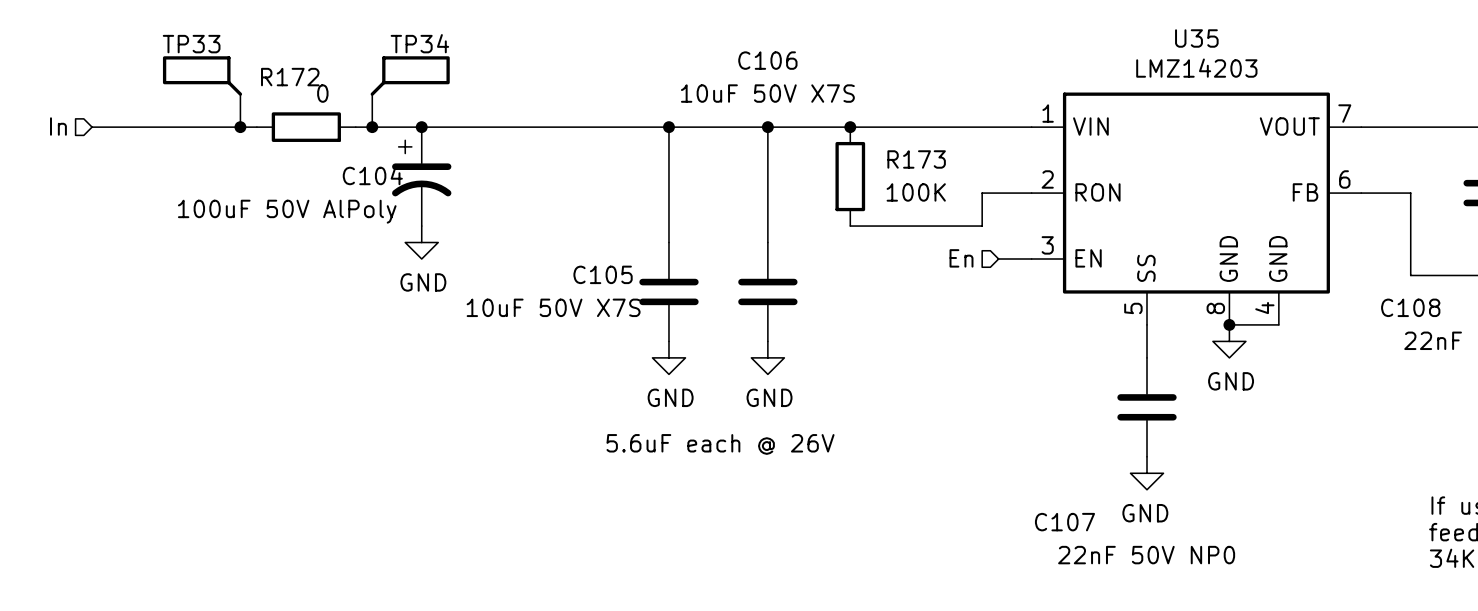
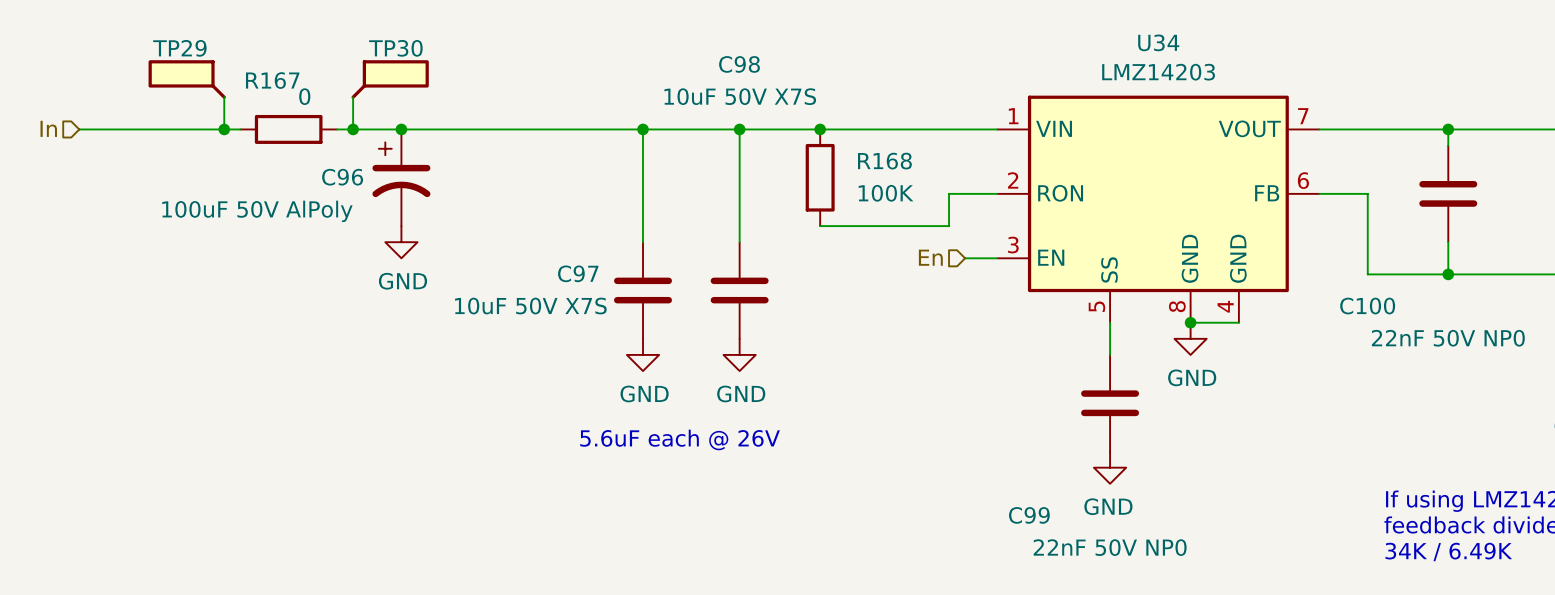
U35 name: U35 (1196, 38) -> U34 (1158, 42)
TP34 name: TP34 (419, 43) -> TP30 (395, 48)
TP33 name: TP33 (191, 44) -> TP29 (179, 48)
C106 name: C106 (767, 60) -> C98 (739, 64)
R172 name: R172 (290, 77) -> R167 (272, 80)
R173 name: R173 (916, 159) -> R168 (884, 161)
C104 name: C104 (372, 175) -> C96 (342, 177)
C105 name: C105 (603, 274) -> C97 (578, 273)
C108 name: C108 (1410, 307) -> C100 (1367, 306)
C107 name: C107 (1064, 522) -> C99 (1029, 515)

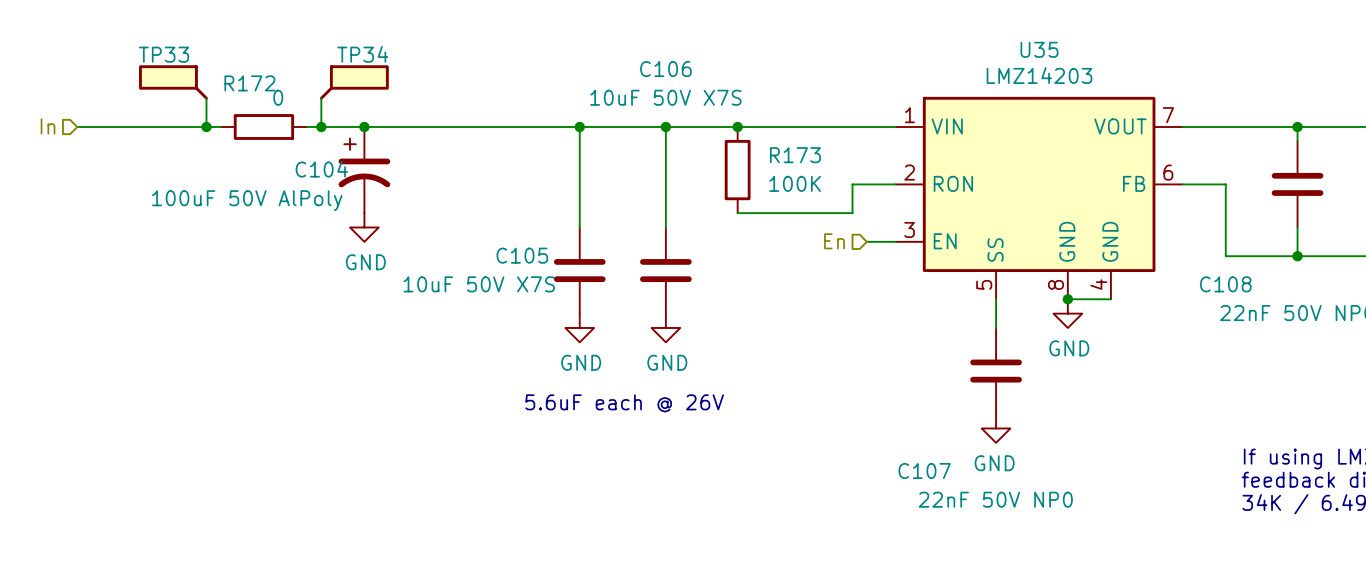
U34 name: U34 (1158, 42) -> U35 (1039, 49)
TP29 name: TP29 (179, 48) -> TP33 (164, 54)
TP30 name: TP30 (395, 48) -> TP34 (362, 54)
C98 name: C98 (739, 64) -> C106 (665, 69)
R167 name: R167 (272, 80) -> R172 (249, 83)
R168 name: R168 (884, 161) -> R173 (795, 155)
C96 name: C96 (342, 177) -> C104 (321, 169)
C97 name: C97 (578, 273) -> C105 (522, 255)
C100 name: C100 (1367, 306) -> C108 (1225, 284)
C99 name: C99 (1029, 515) -> C107 (924, 471)

